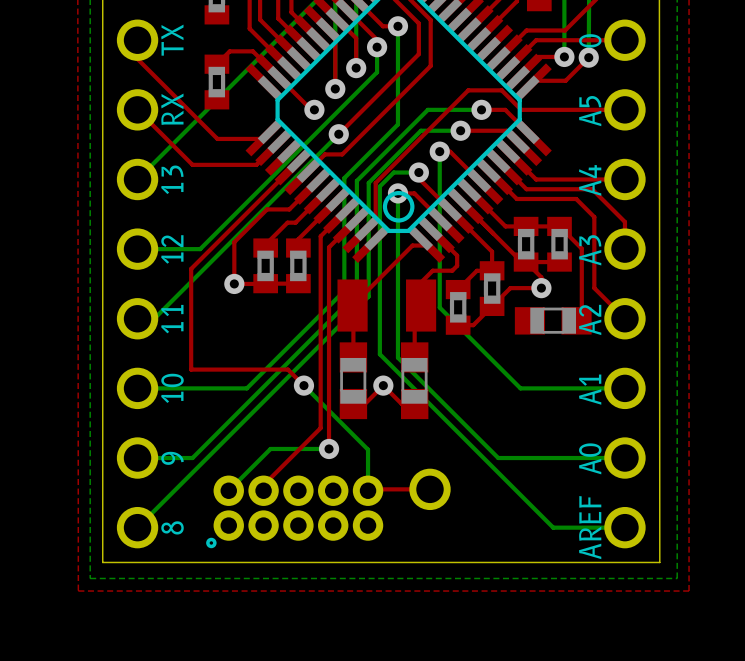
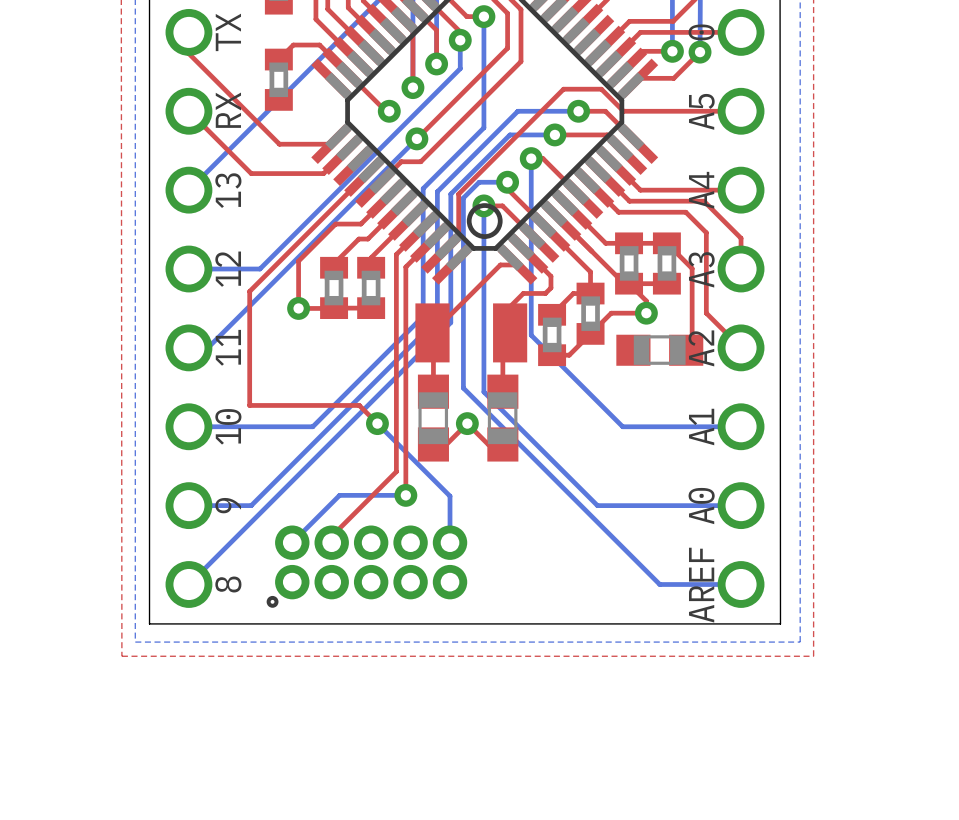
top track: (430, 489) (368, 490) -> none
part: (430, 489) -> none

